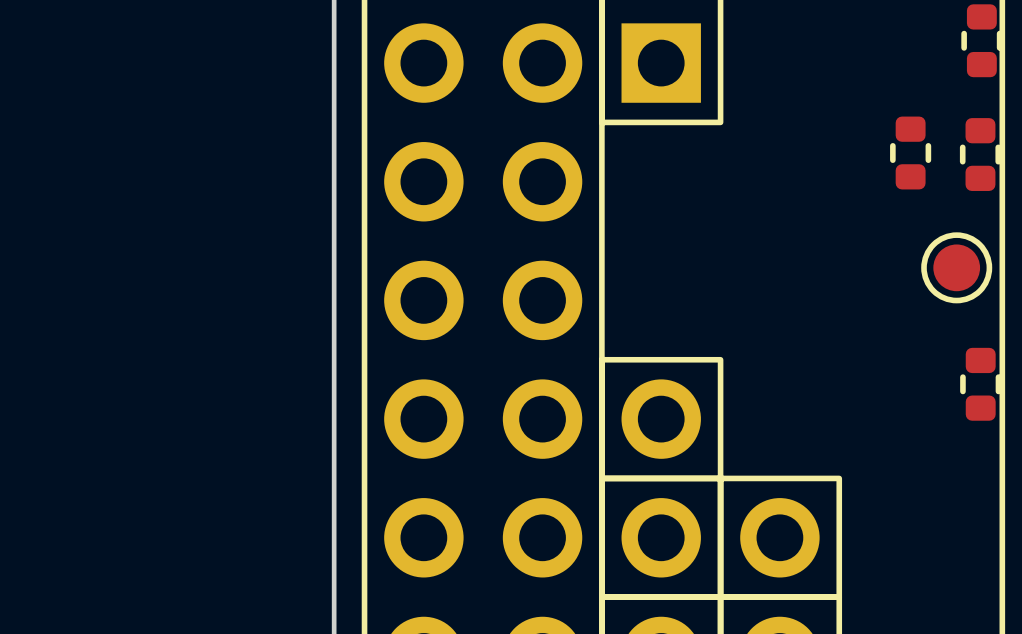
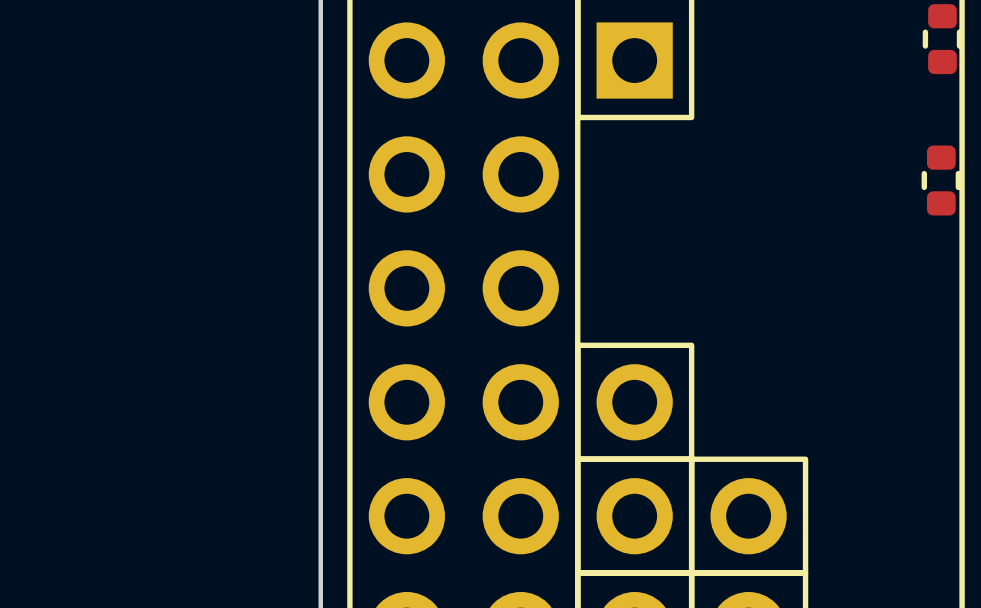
part: (910, 153) -> none
part position: (980, 154) -> (941, 180)
part: (956, 267) -> none
part: (980, 384) -> none

